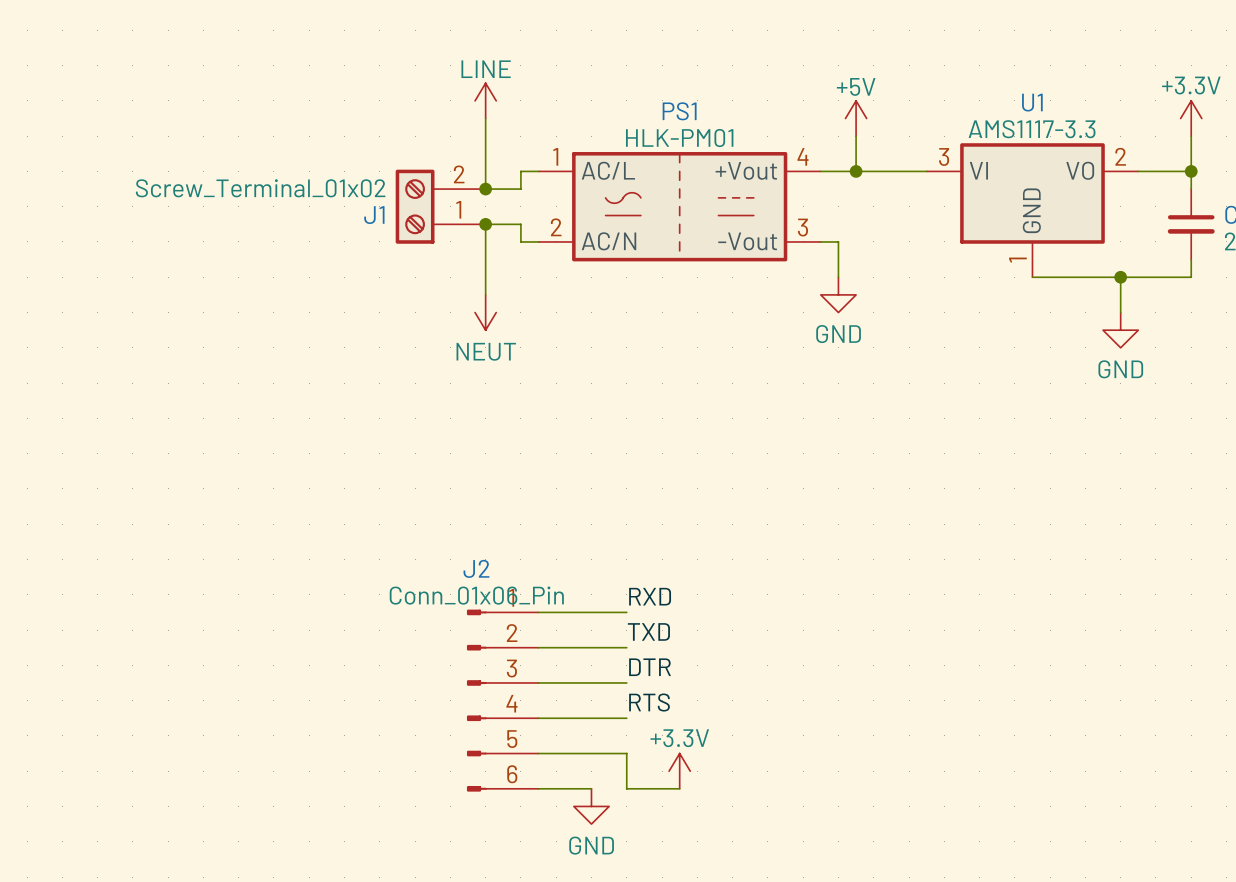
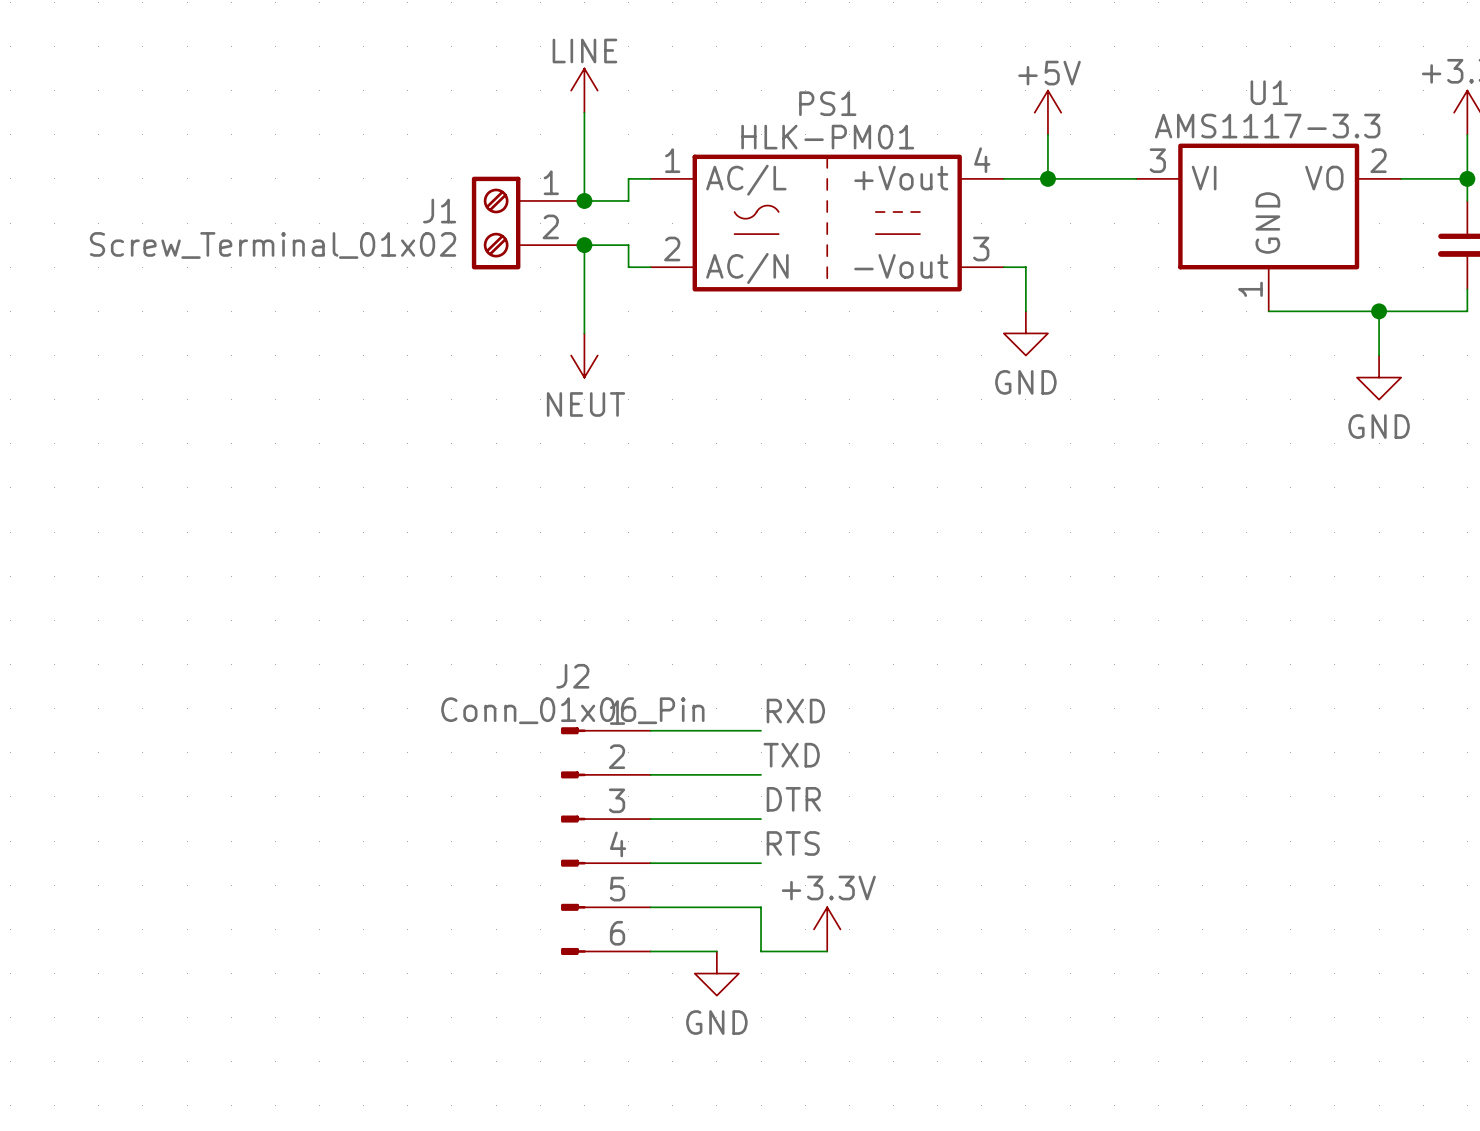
J1 flip: as is (415, 206) -> up-down (496, 223)

